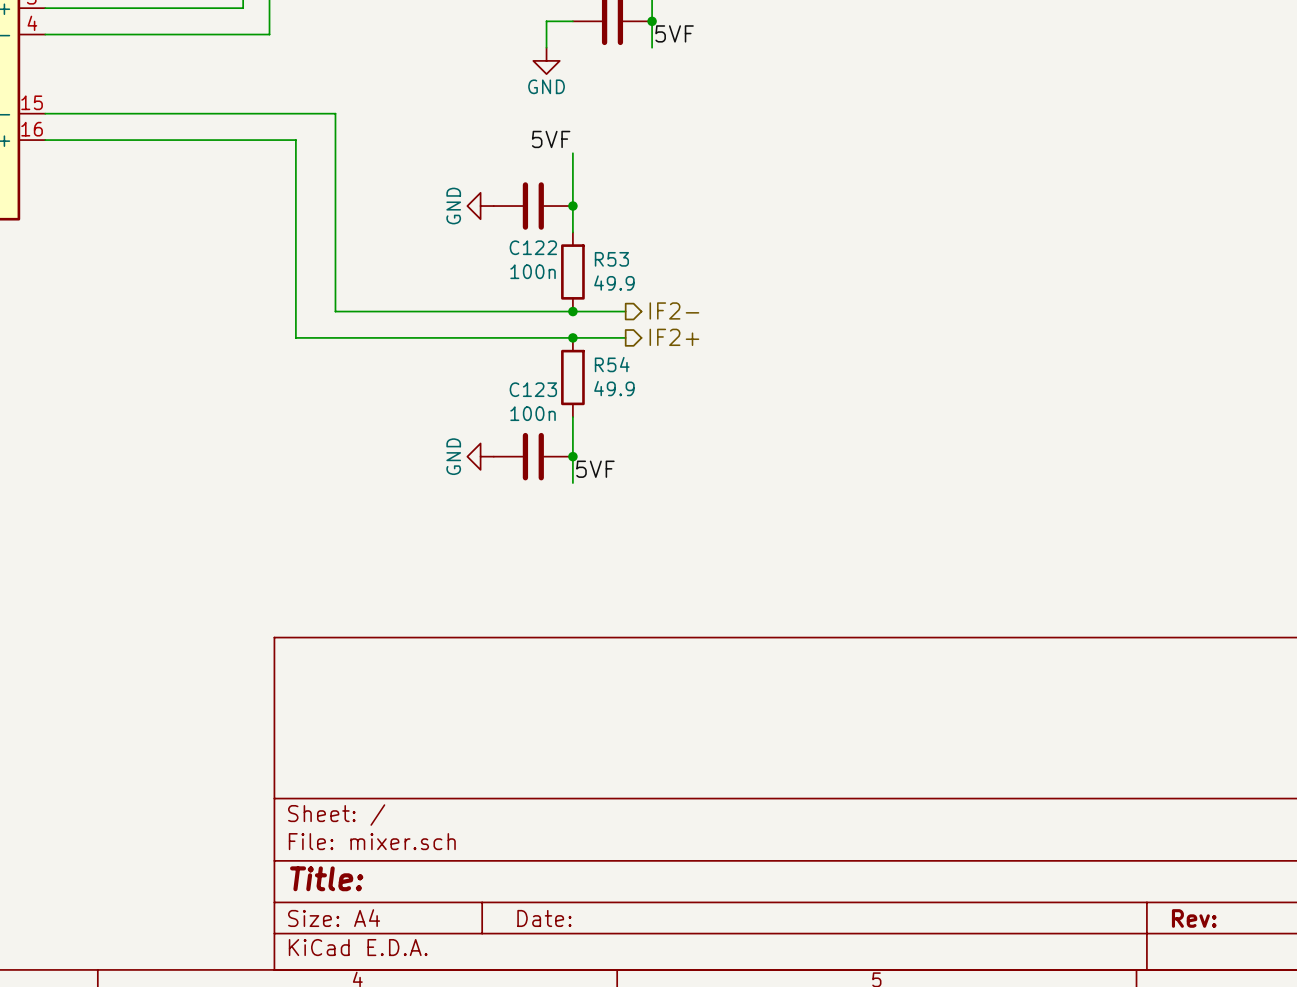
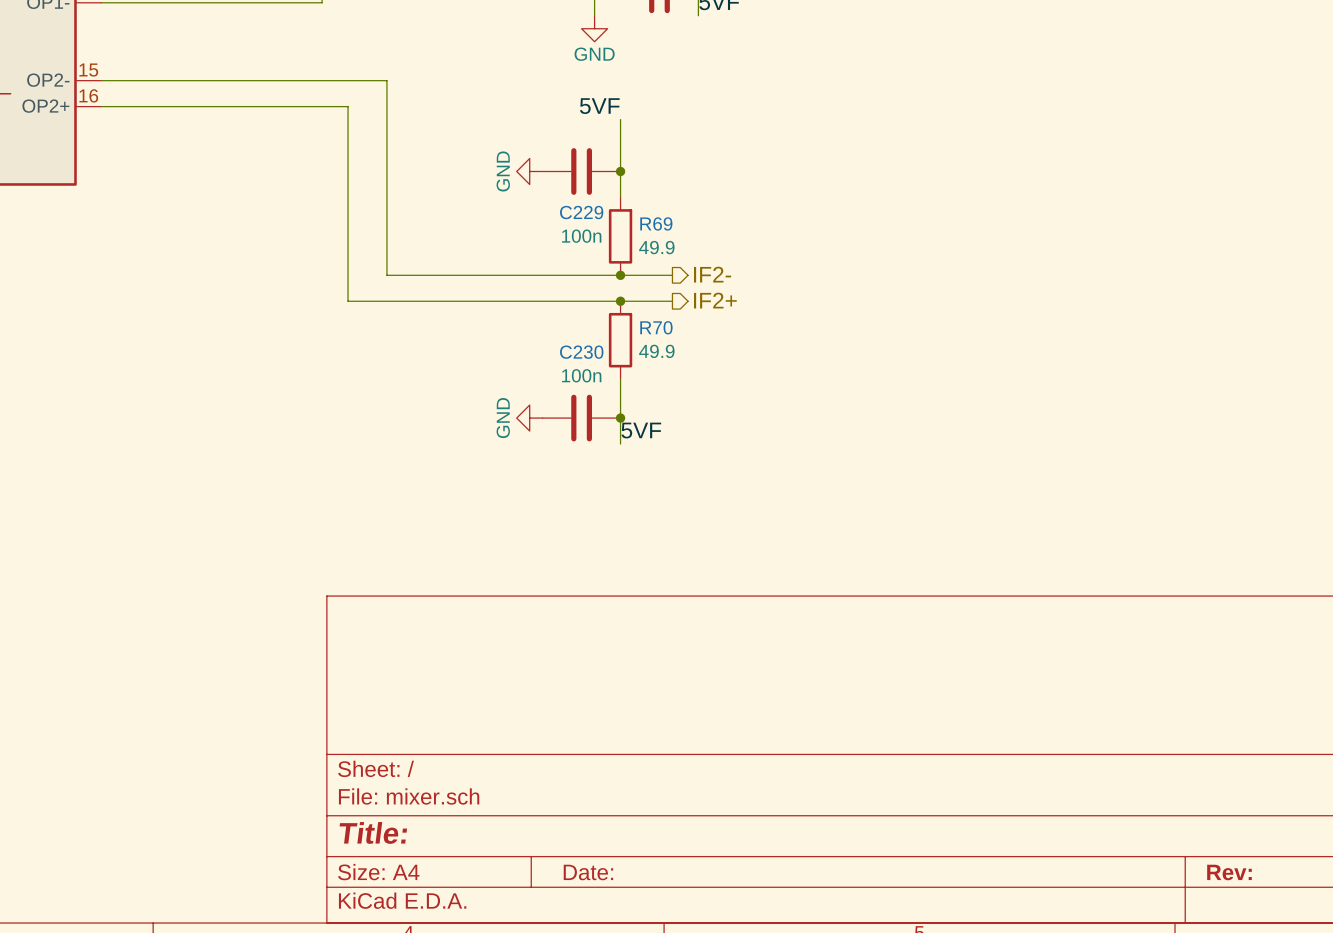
C122 name: C122 (533, 247) -> C229 (581, 212)
R53 name: R53 (611, 259) -> R69 (656, 223)
R54 name: R54 (612, 364) -> R70 (656, 327)
C123 name: C123 (533, 389) -> C230 (581, 352)

